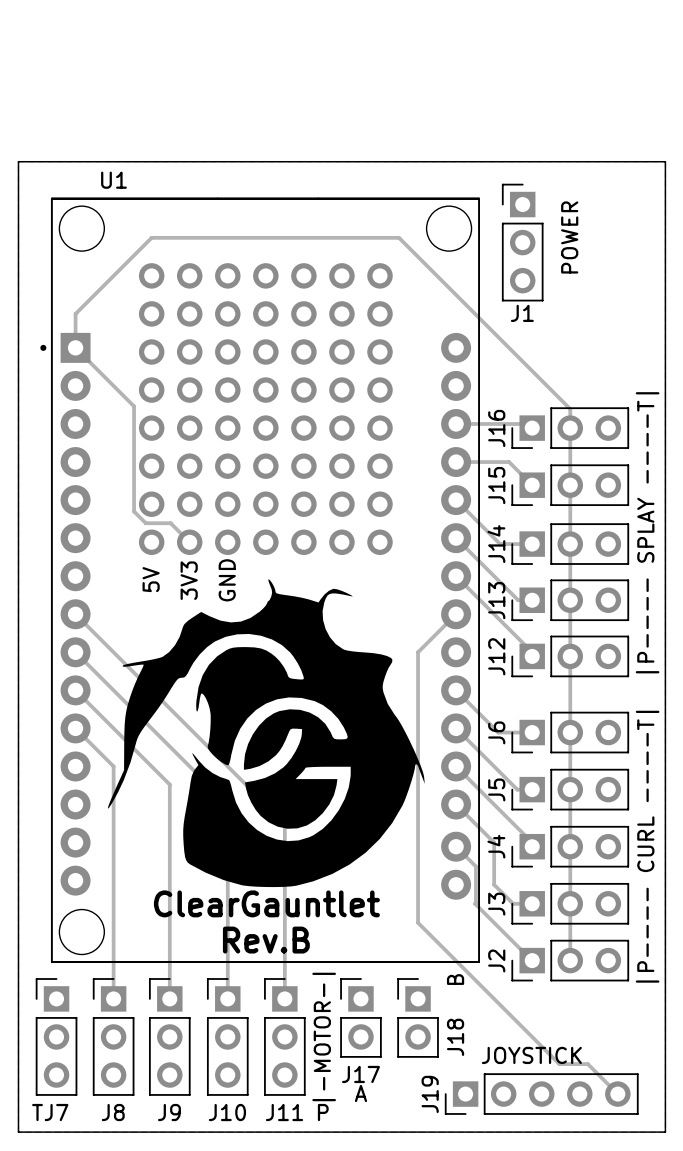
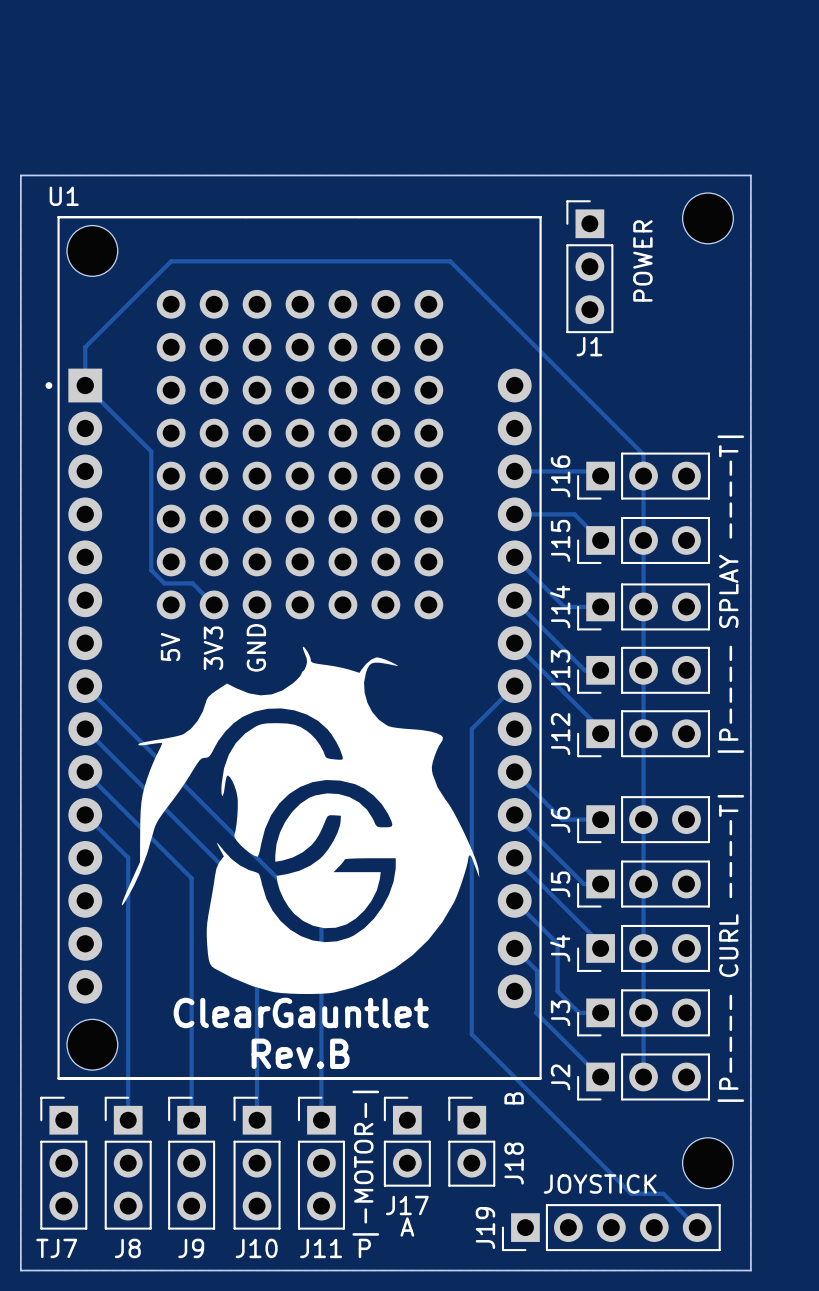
U1 name position: U1 (113, 180) -> U1 (64, 196)
U1 footprint: [40, 197, 480, 963] -> [45, 216, 542, 1080]
part: none -> (707, 218)
part: none -> (707, 1163)

